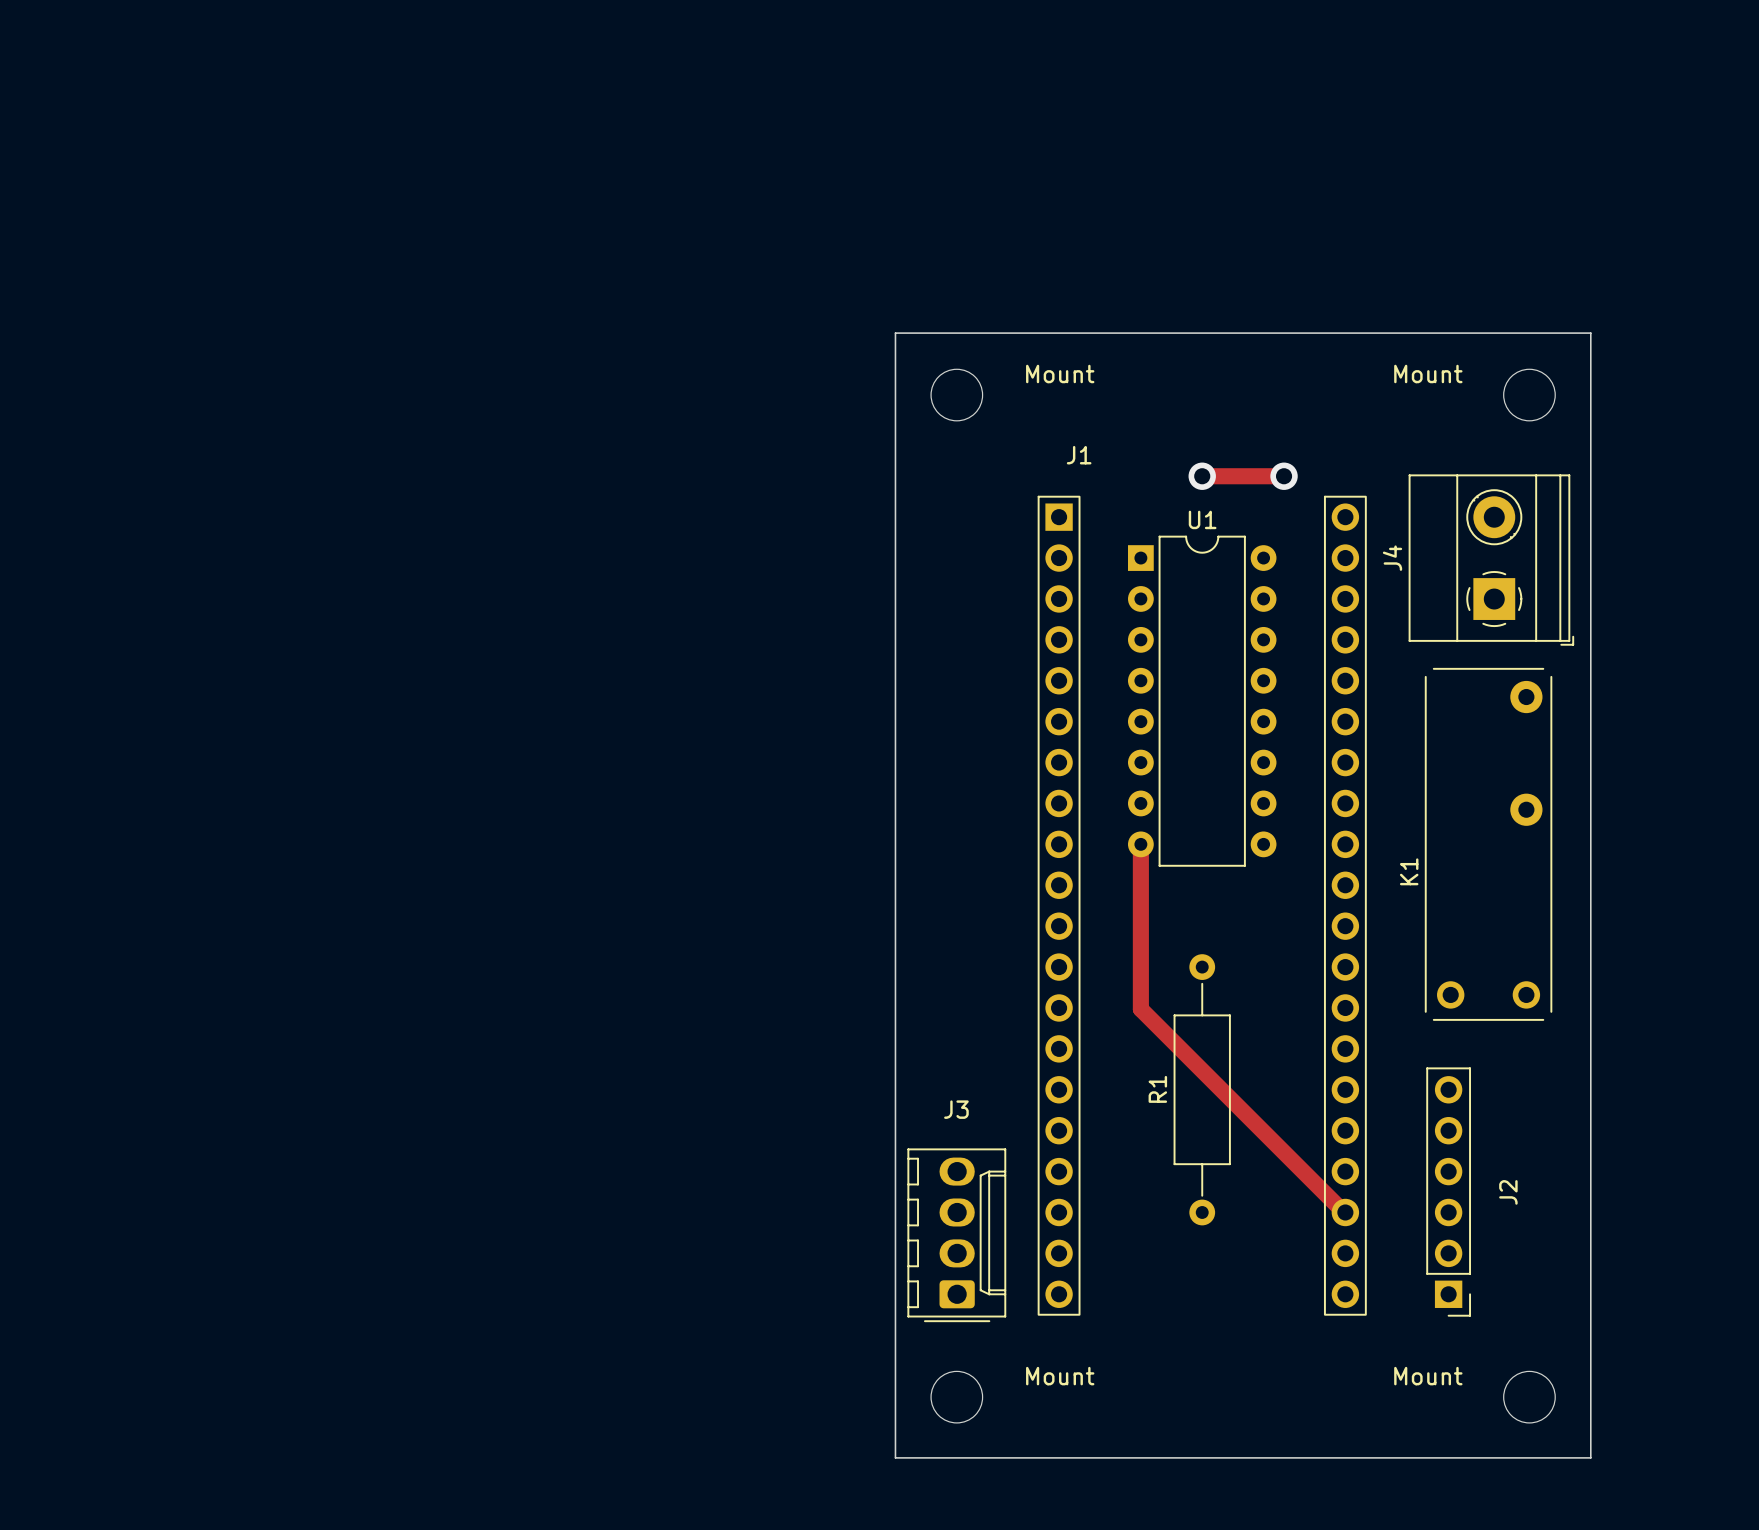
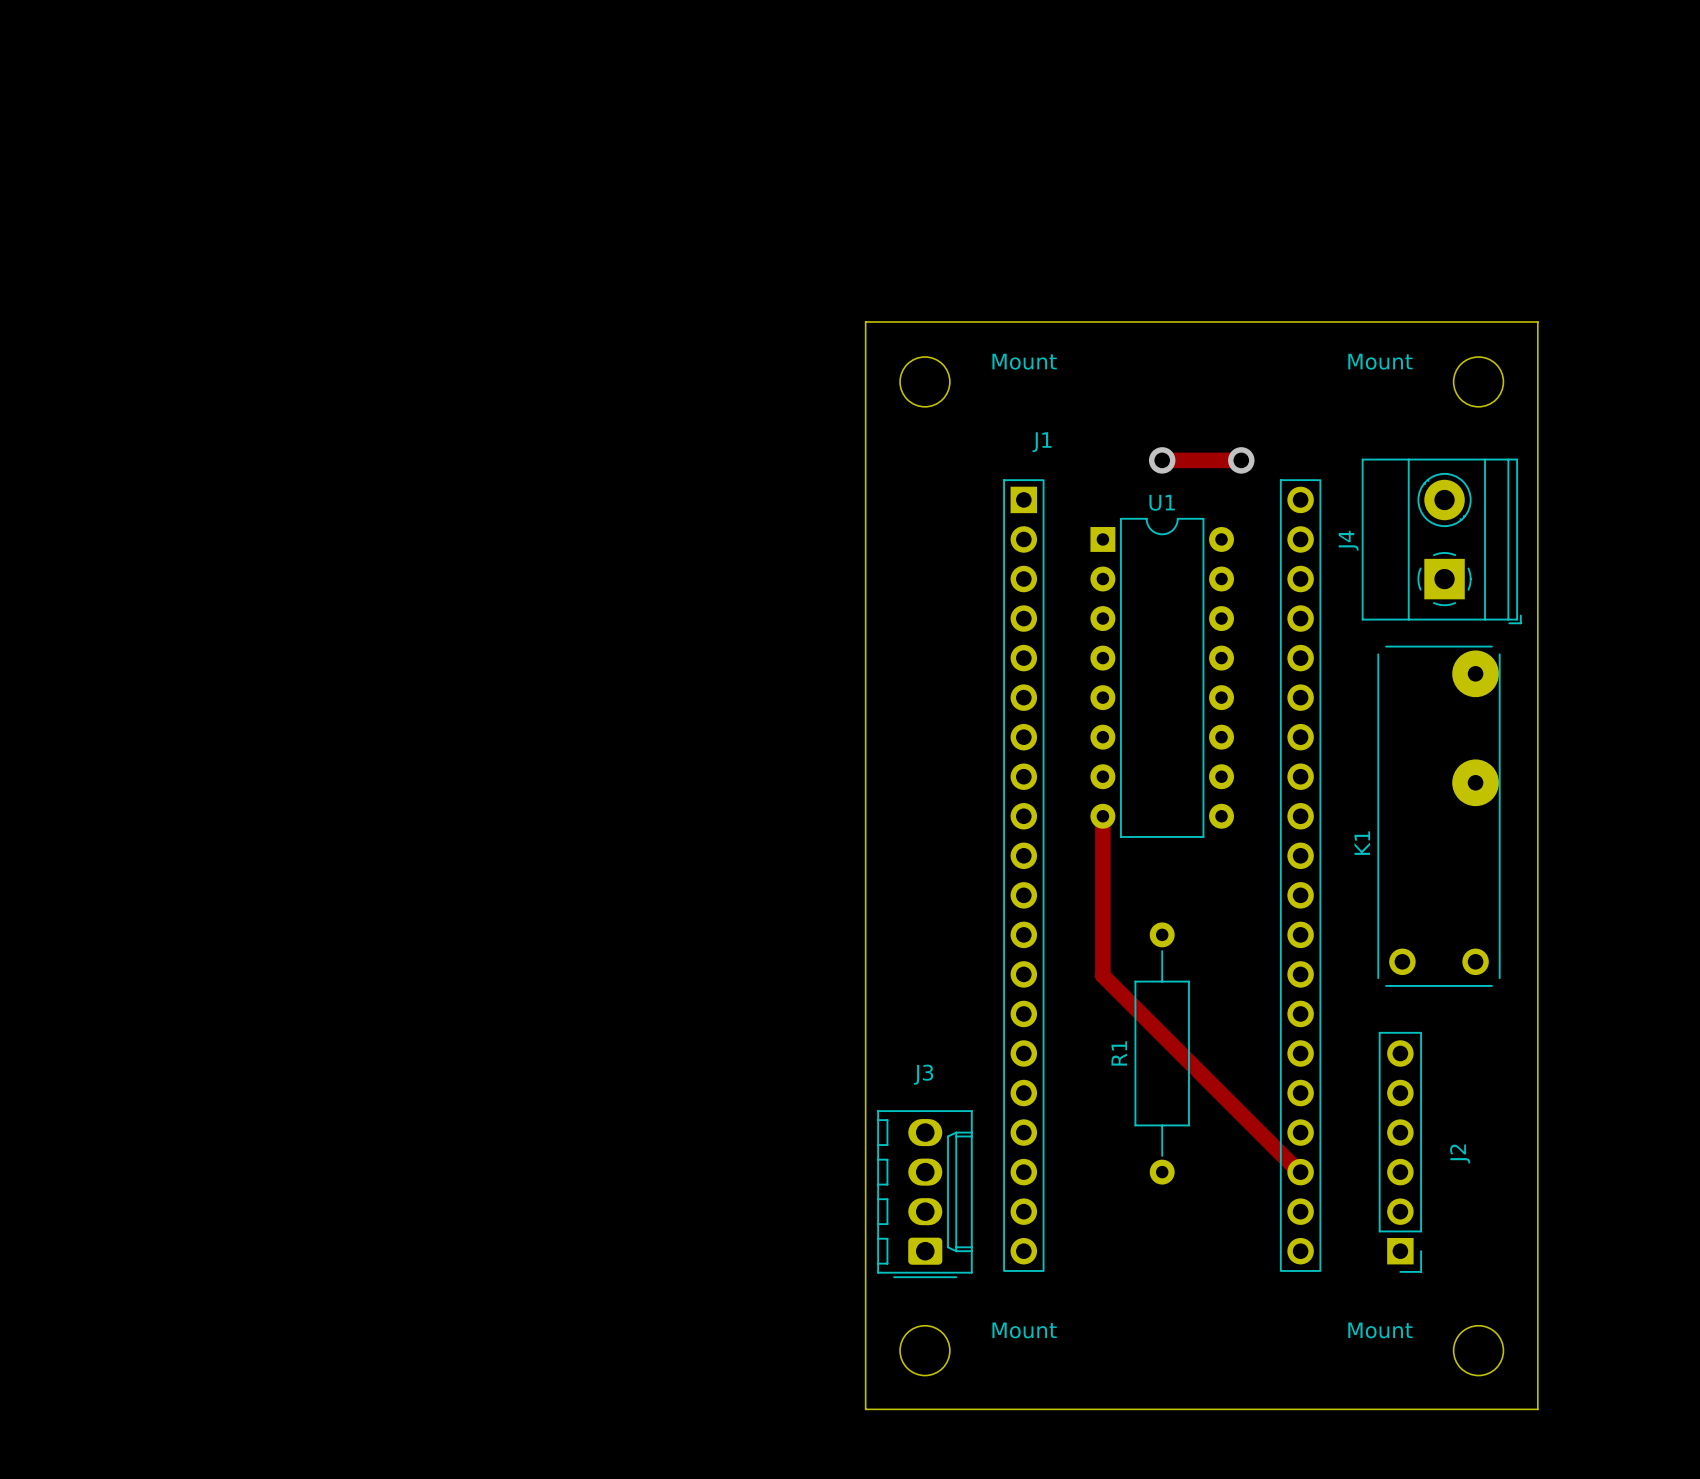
K1 footprint: [1424, 667, 1553, 1021] -> [1377, 645, 1501, 987]

